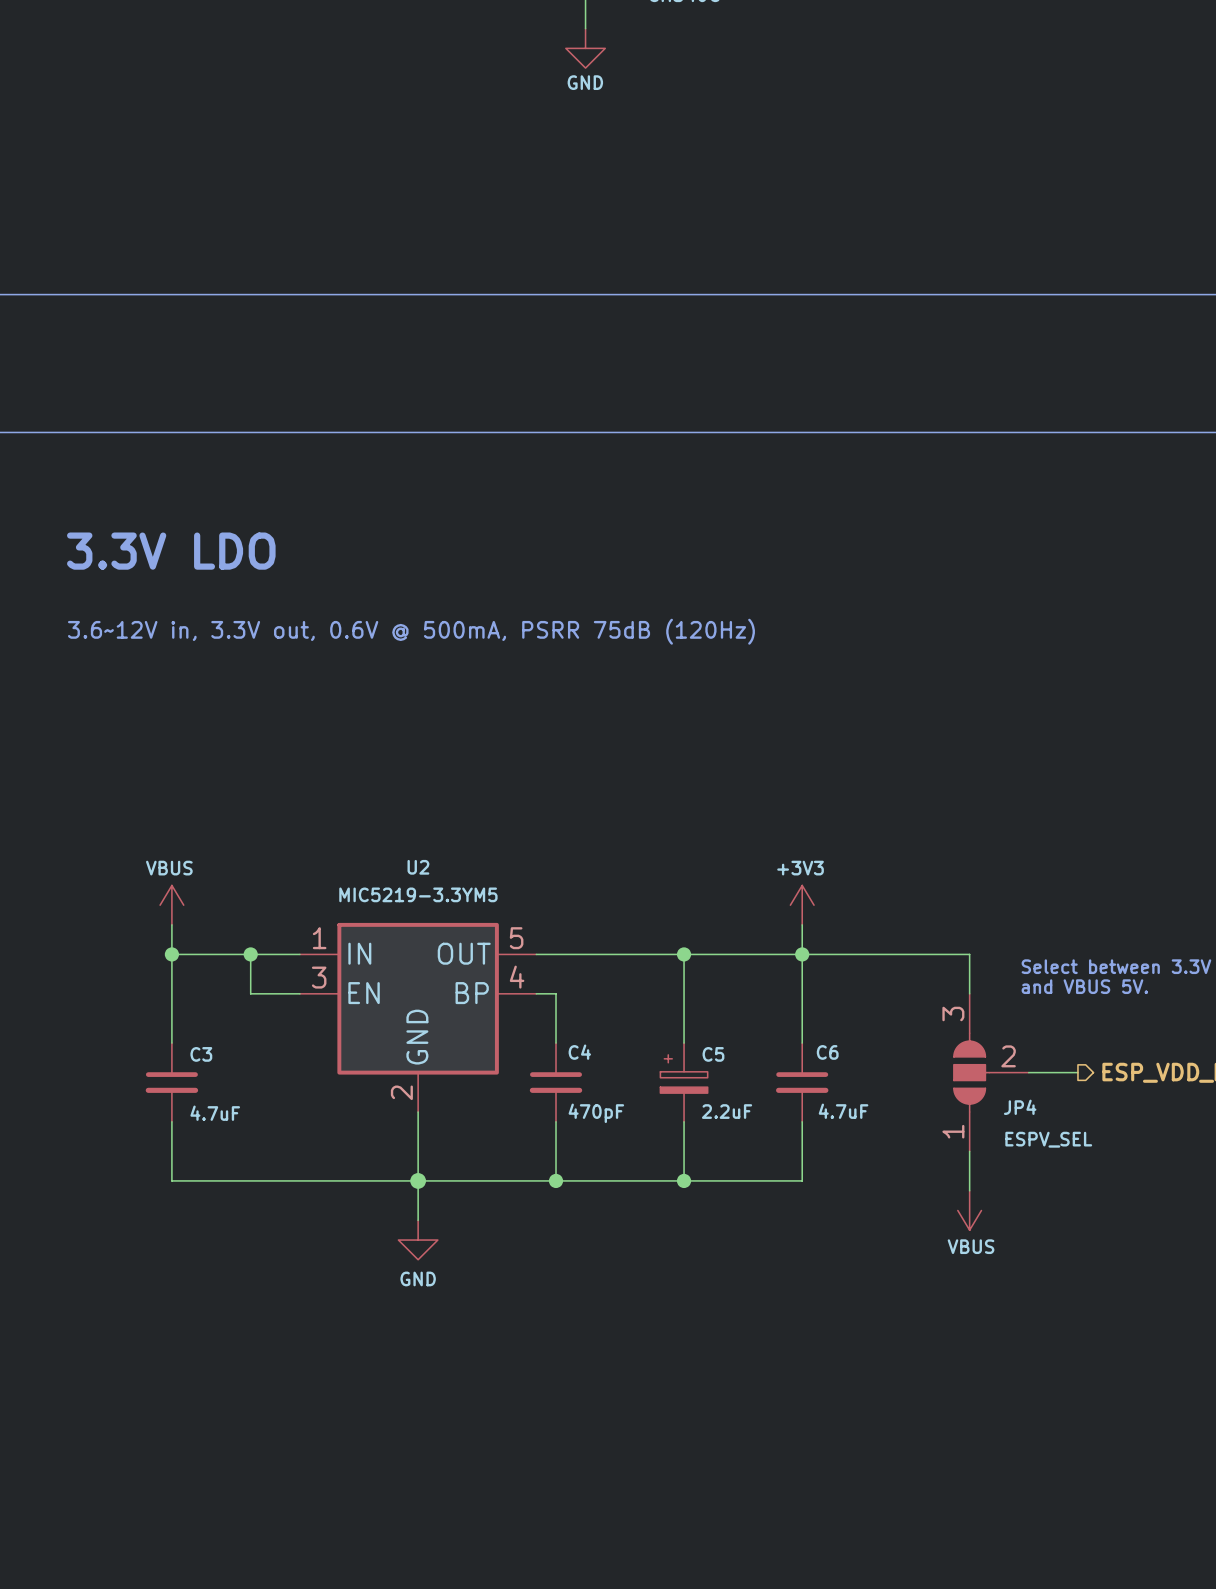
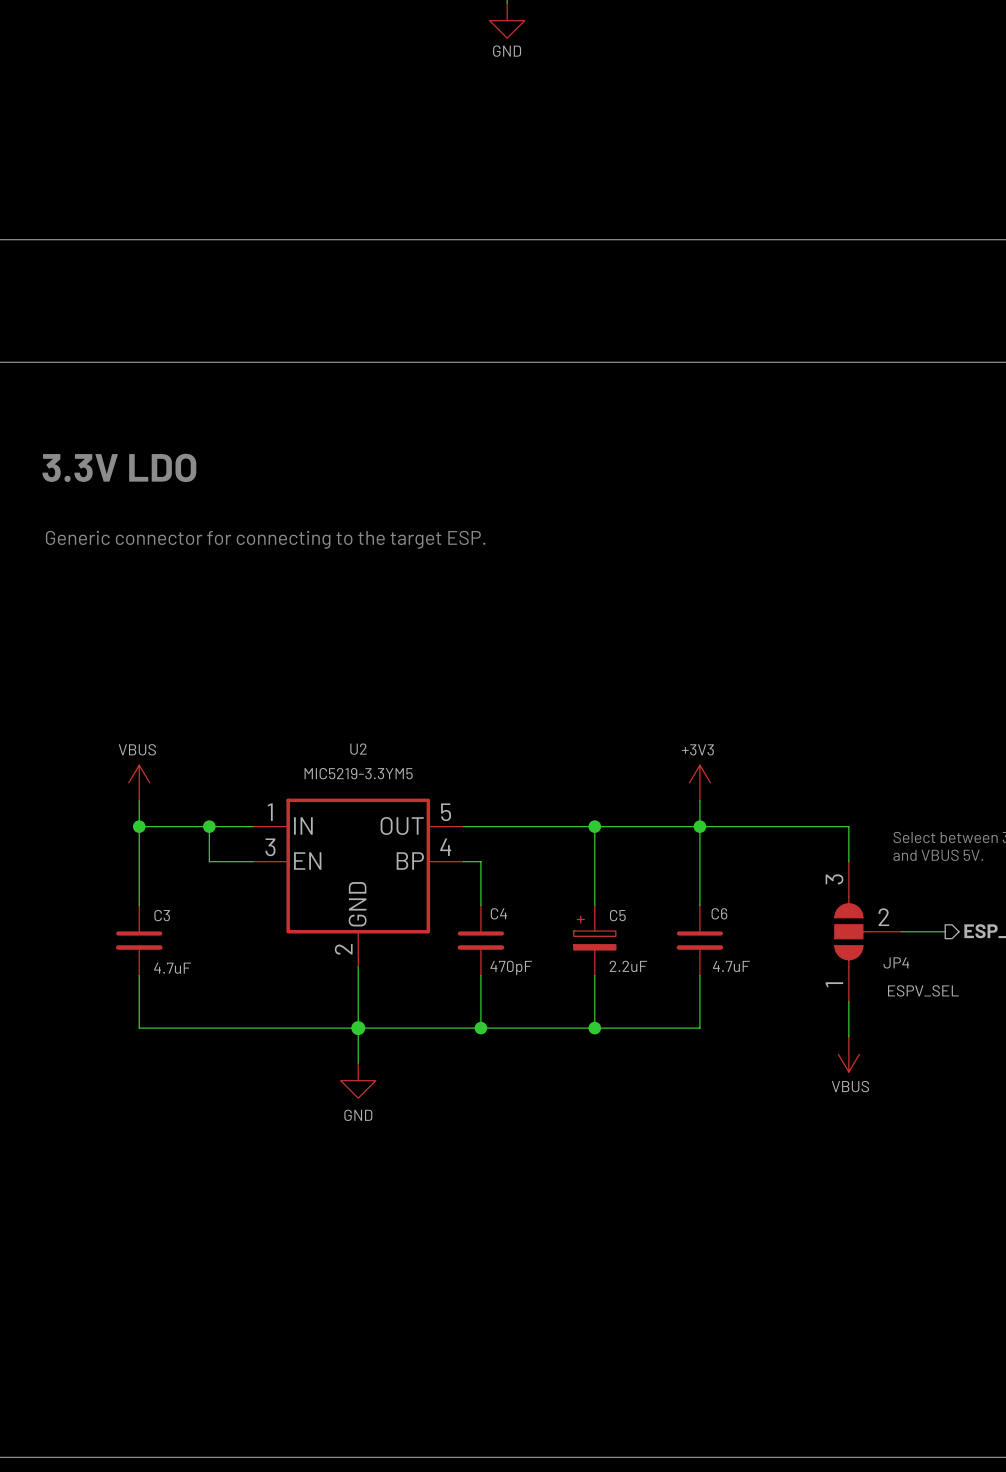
text: 3.6~12V in, 3.3V out, 0.6V @ 500mA, PSRR 75dB (120Hz) (411, 631) -> Generic connector for connecting to the target ESP. (265, 539)

